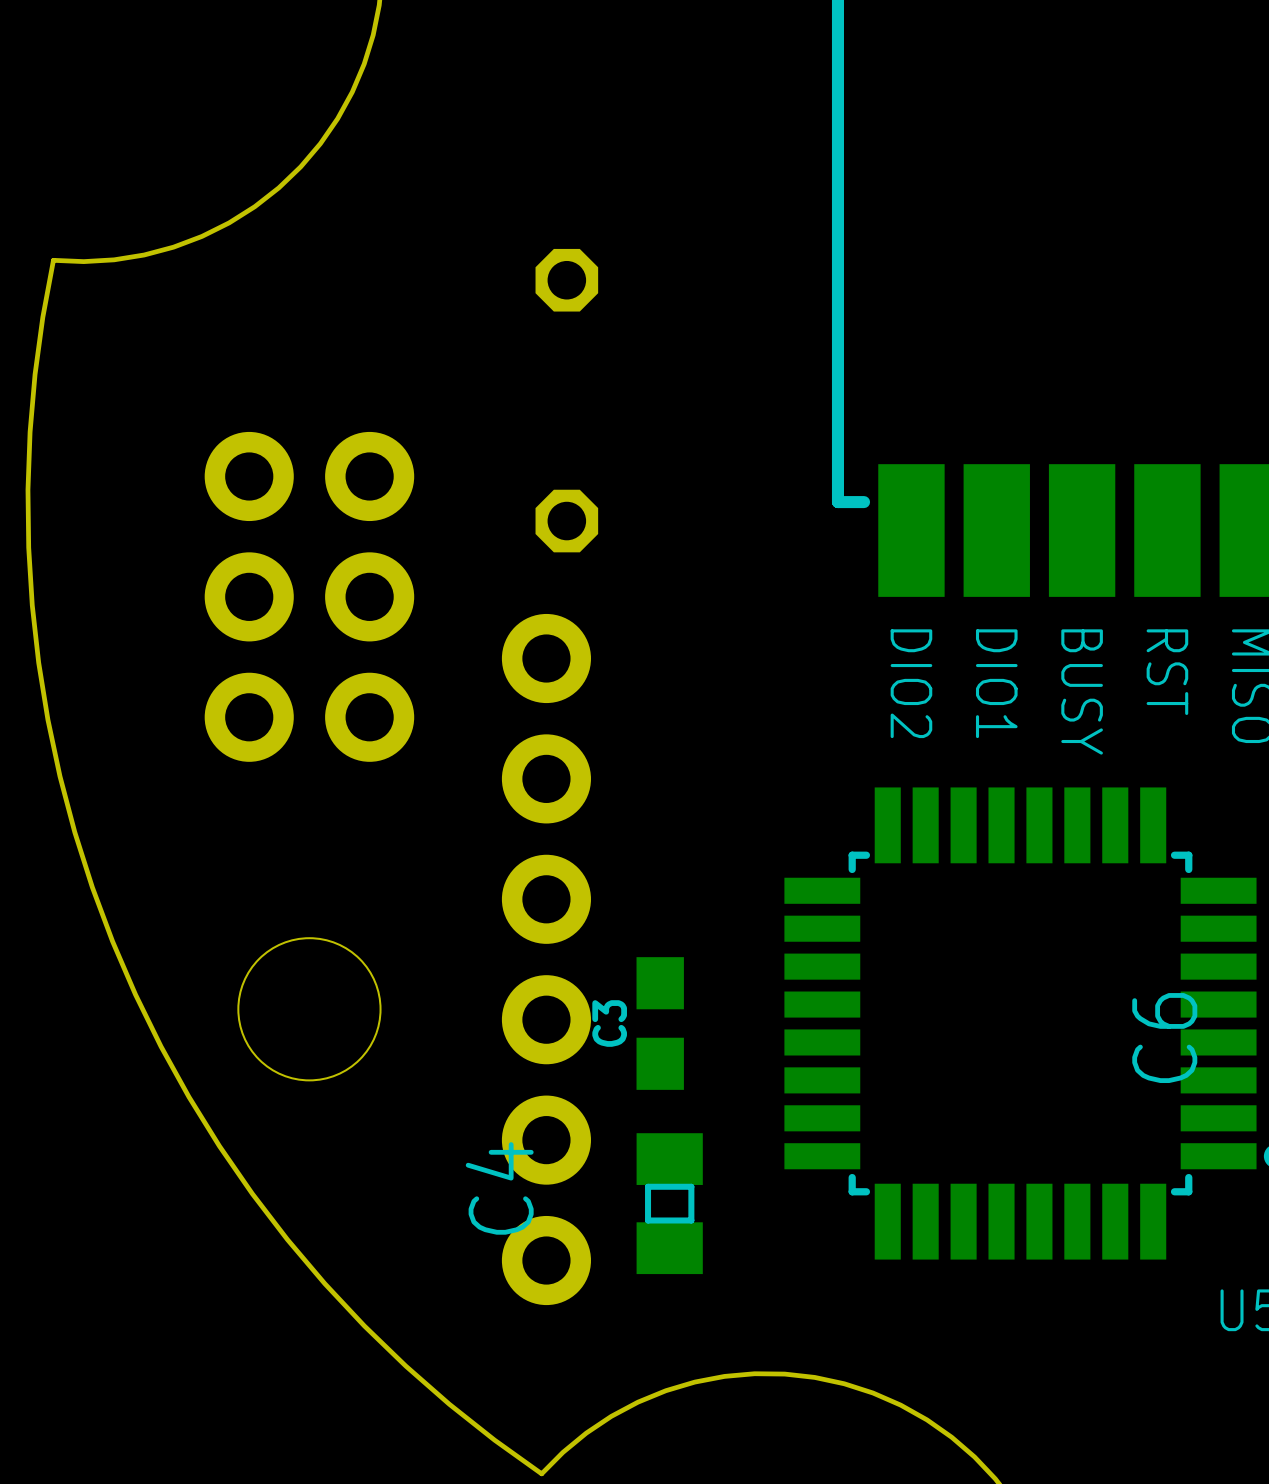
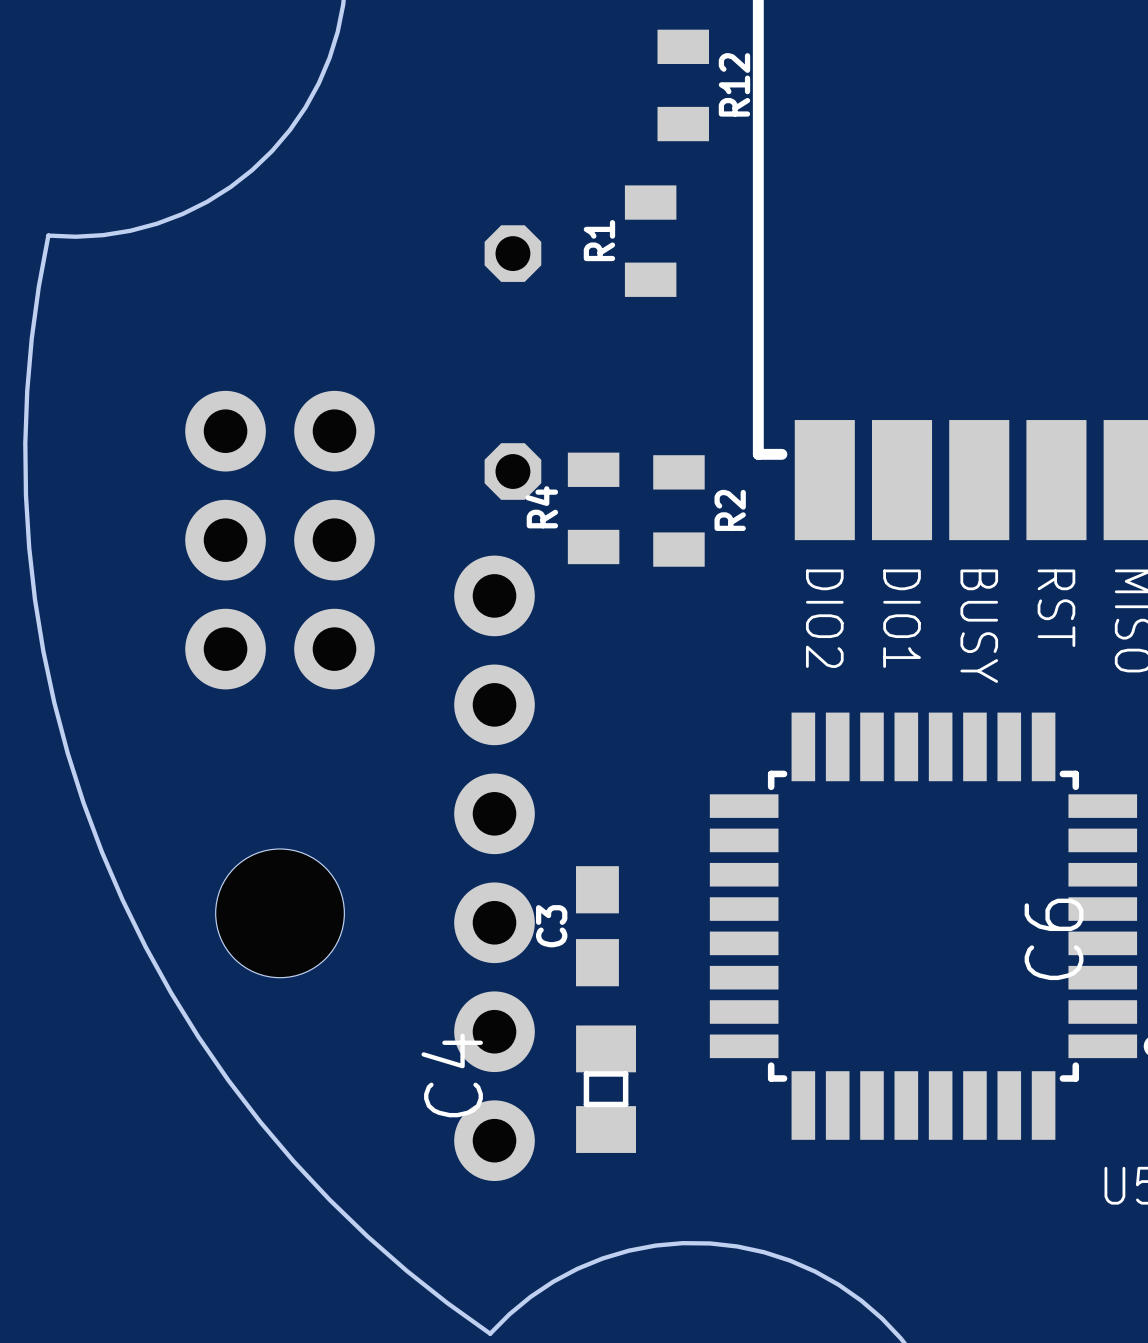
R12: none -> (683, 85)
R1: none -> (650, 241)
R4: none -> (593, 508)
R2: none -> (678, 510)

